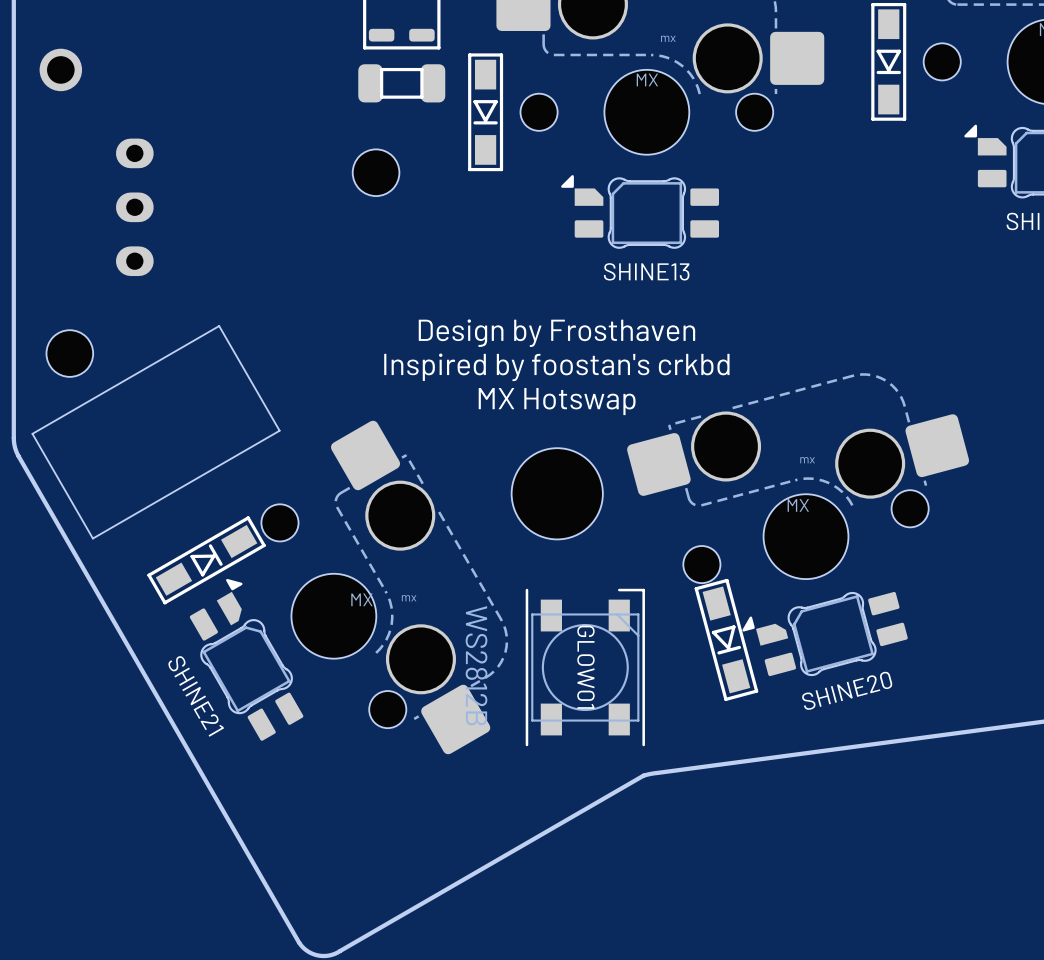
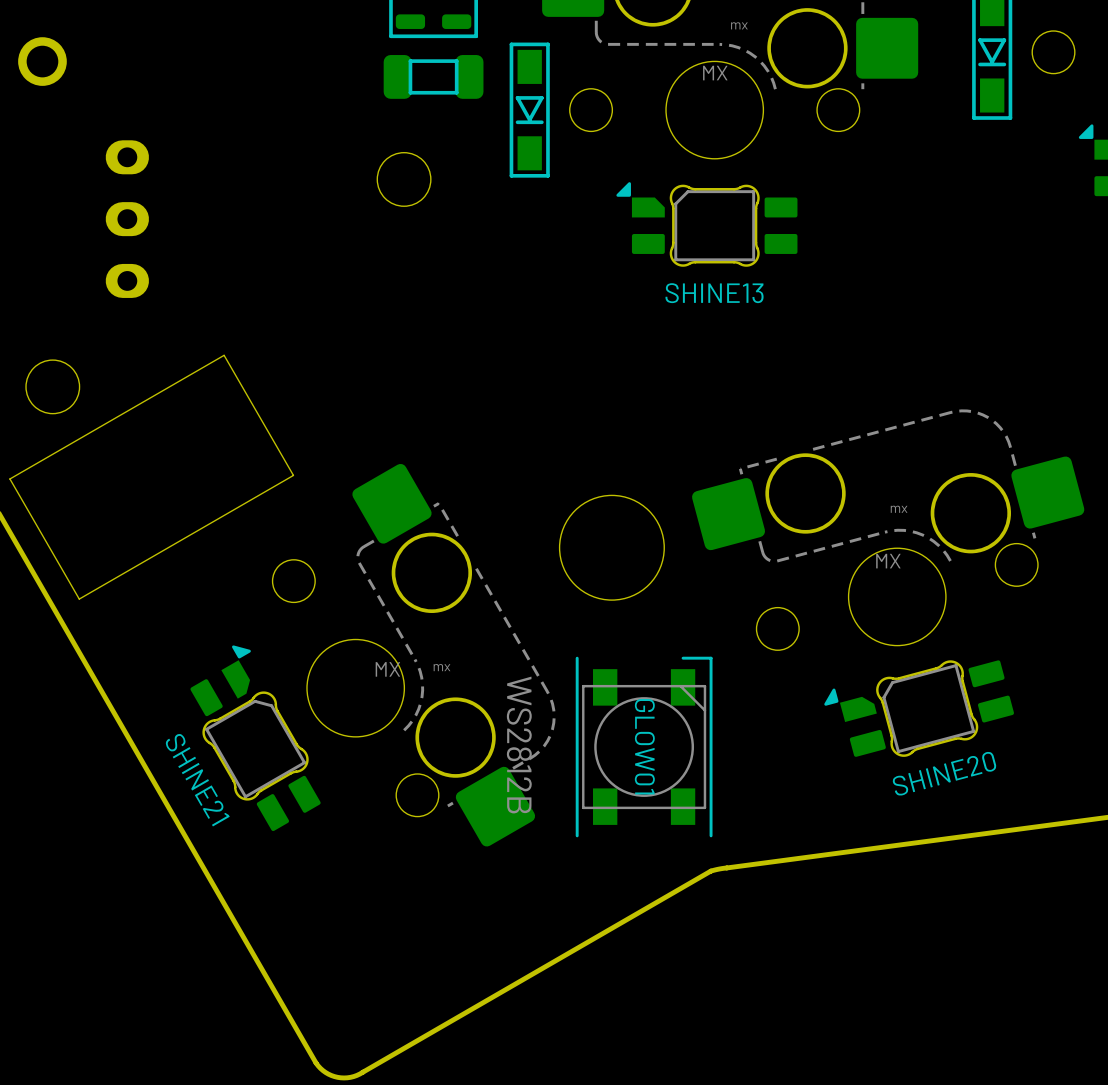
text: Design by Frosthaven (556, 333) -> none
text: Inspired by foostan's crkbd (556, 367) -> none
text: MX Hotswap (557, 401) -> none
part: (206, 560) -> none
part: (726, 639) -> none

